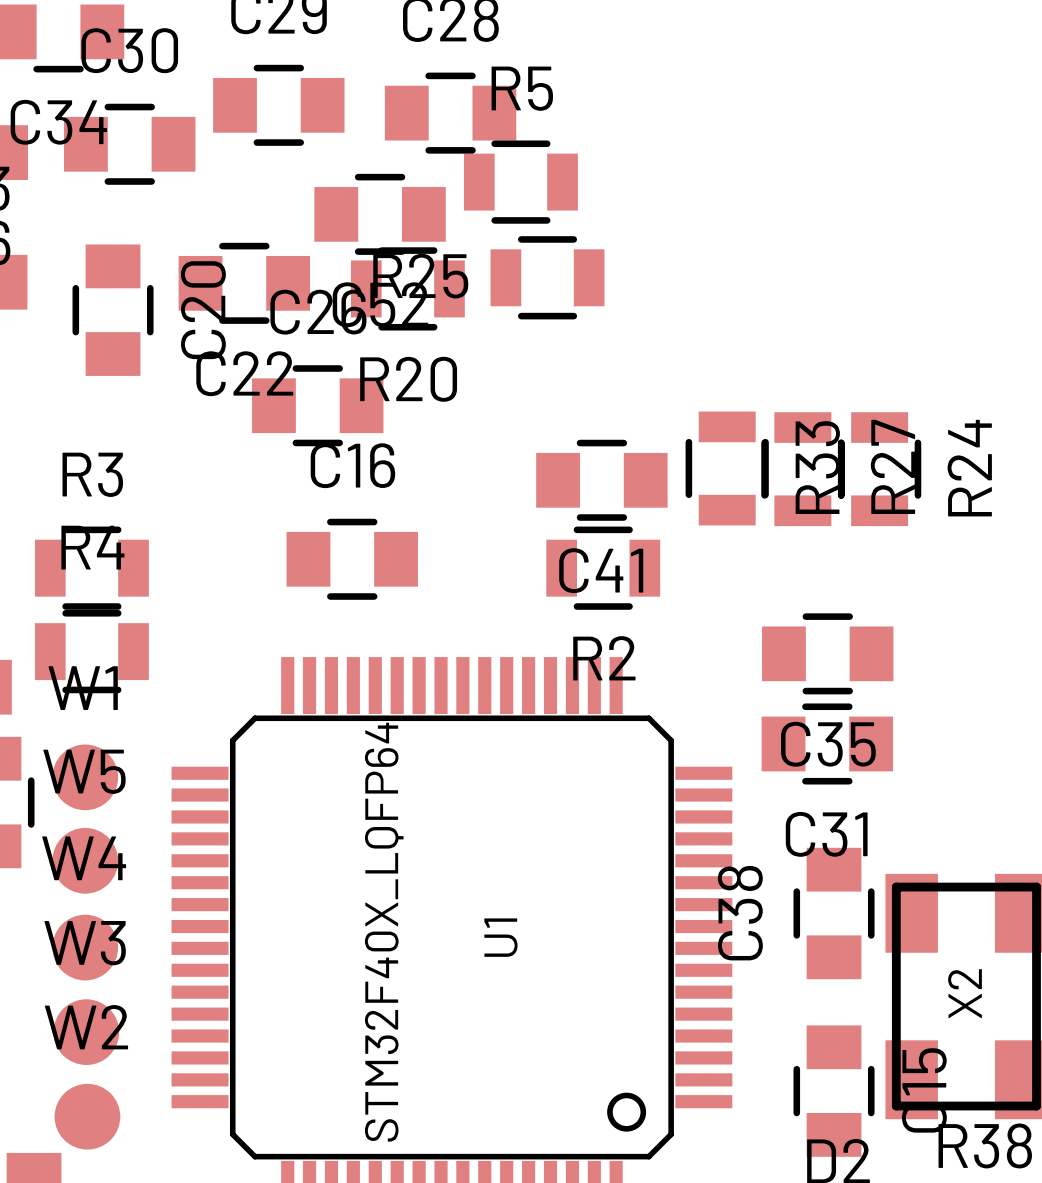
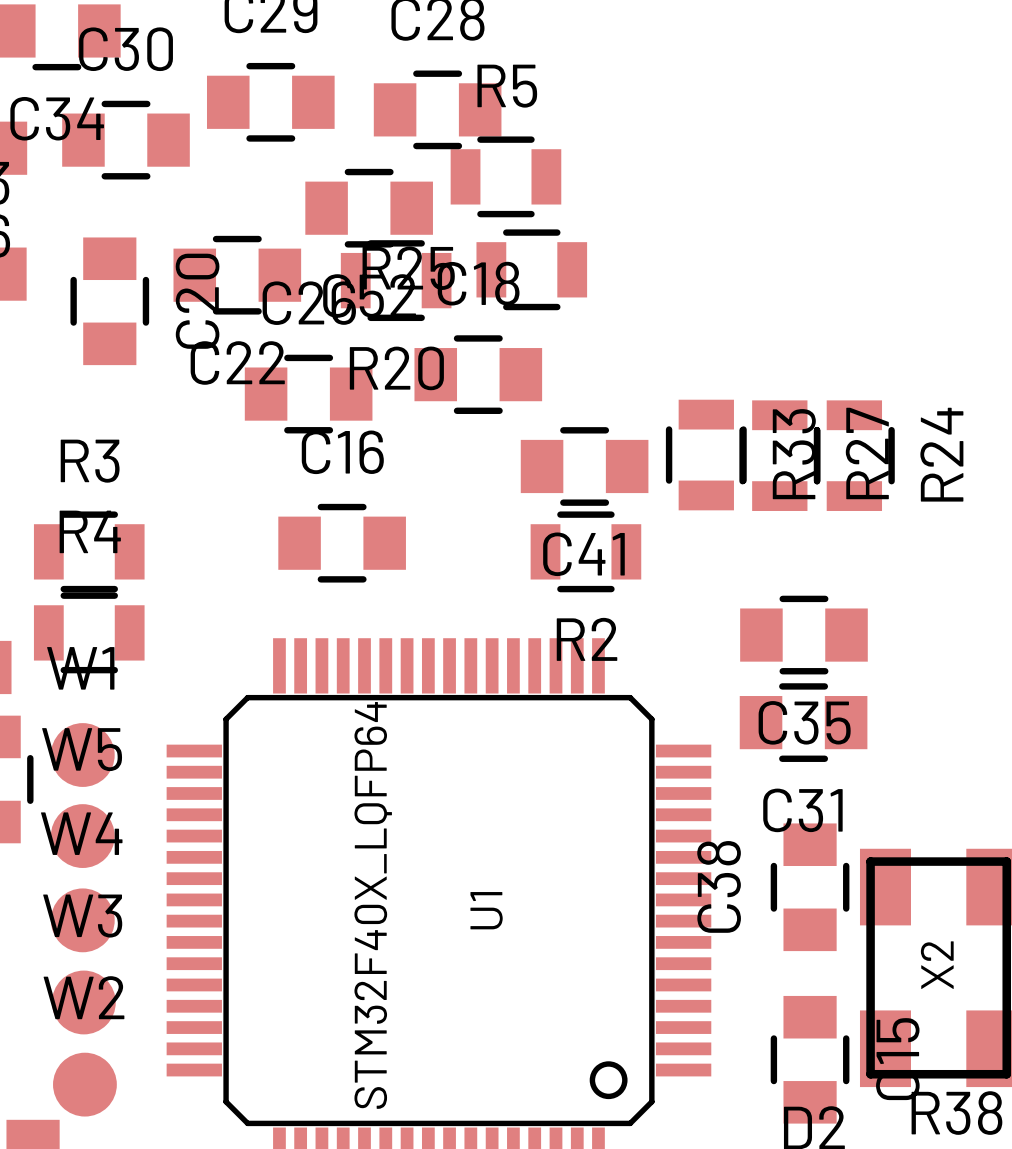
C18: none -> (478, 374)

